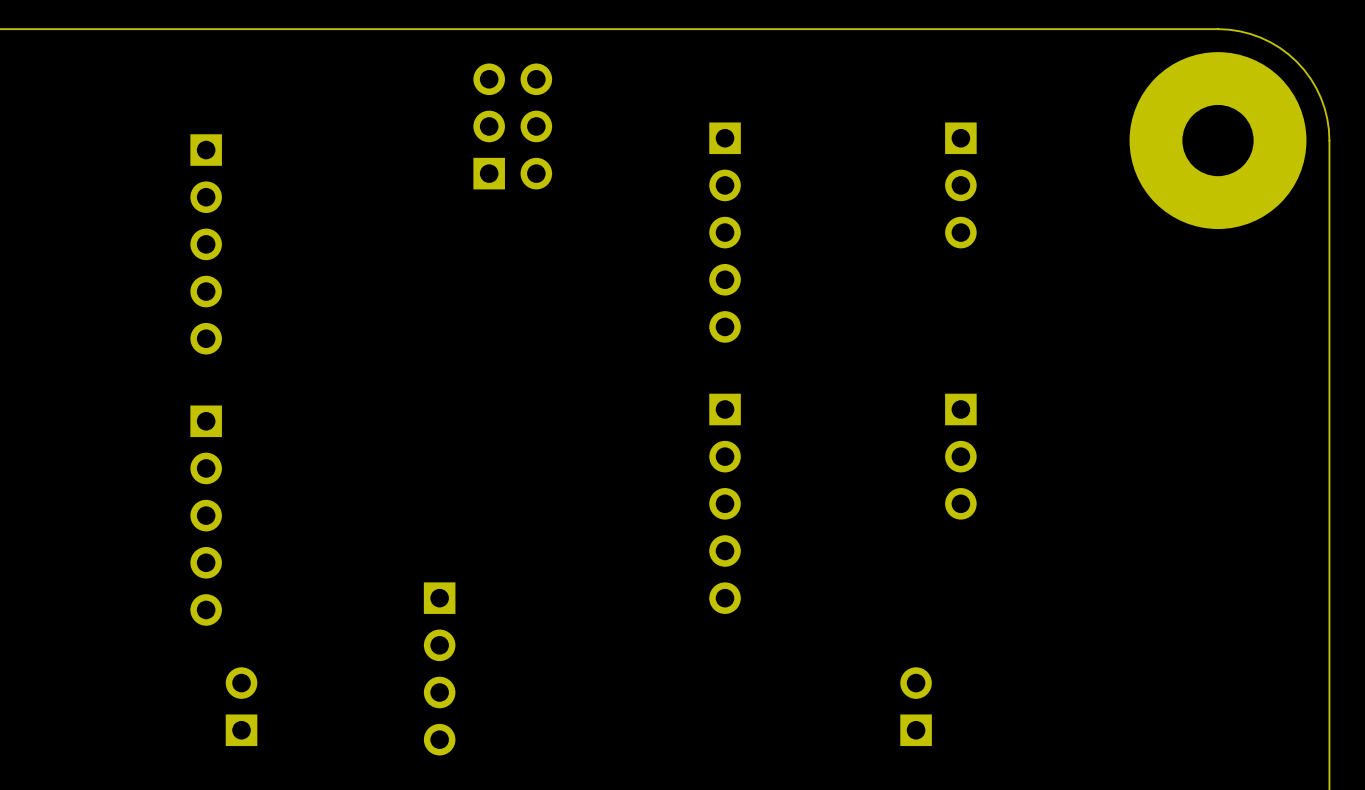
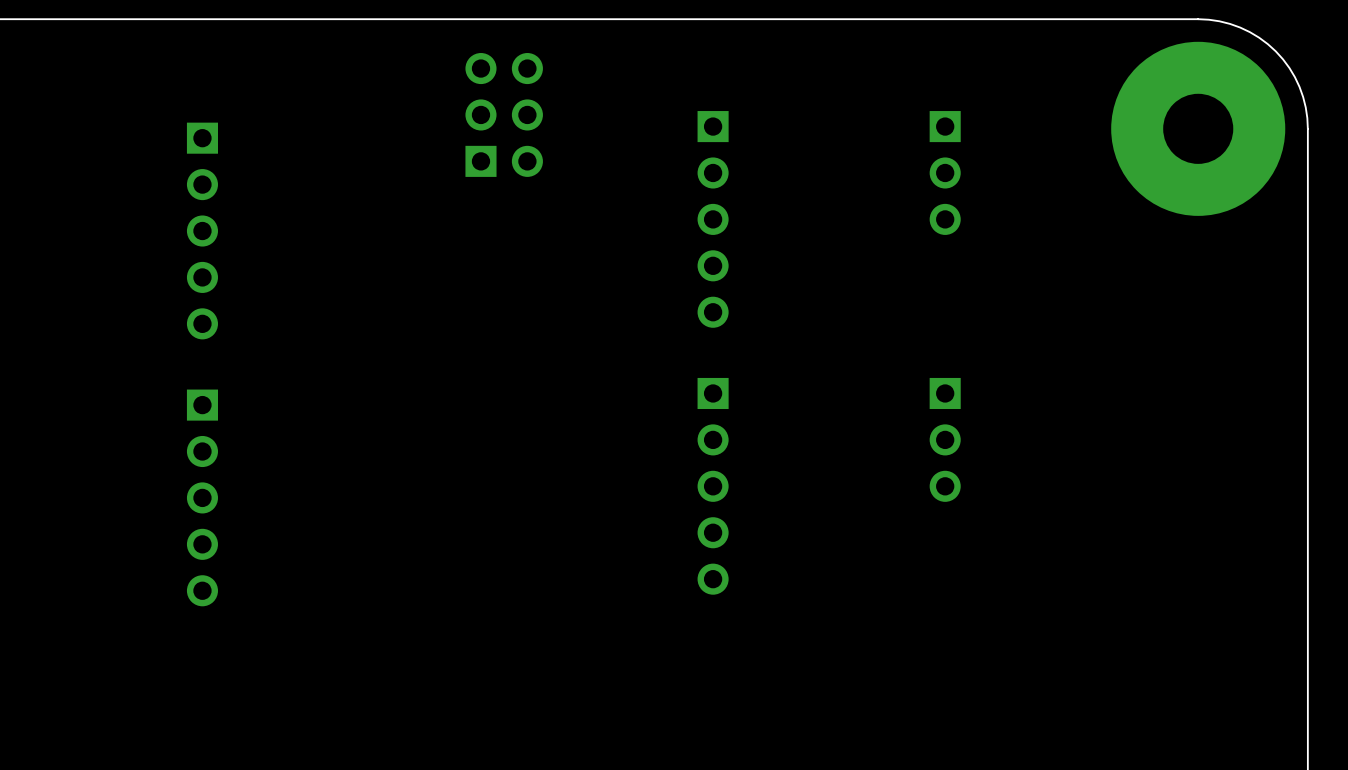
part: (439, 668) -> none
part: (241, 706) -> none
part: (916, 706) -> none

